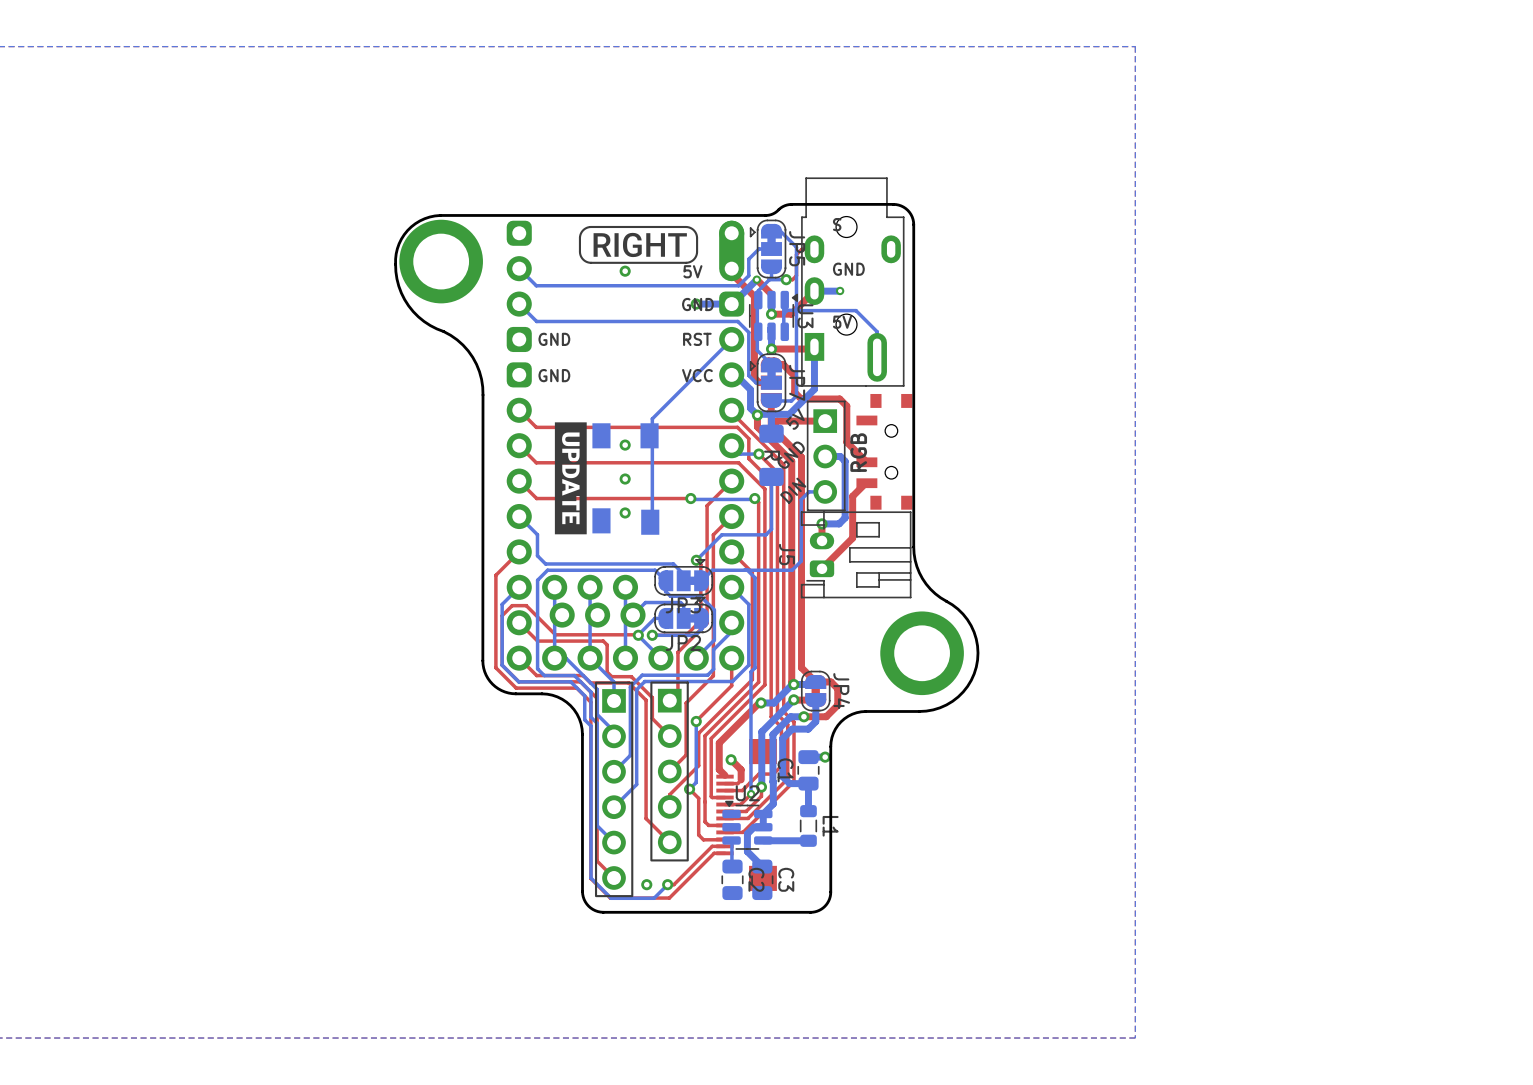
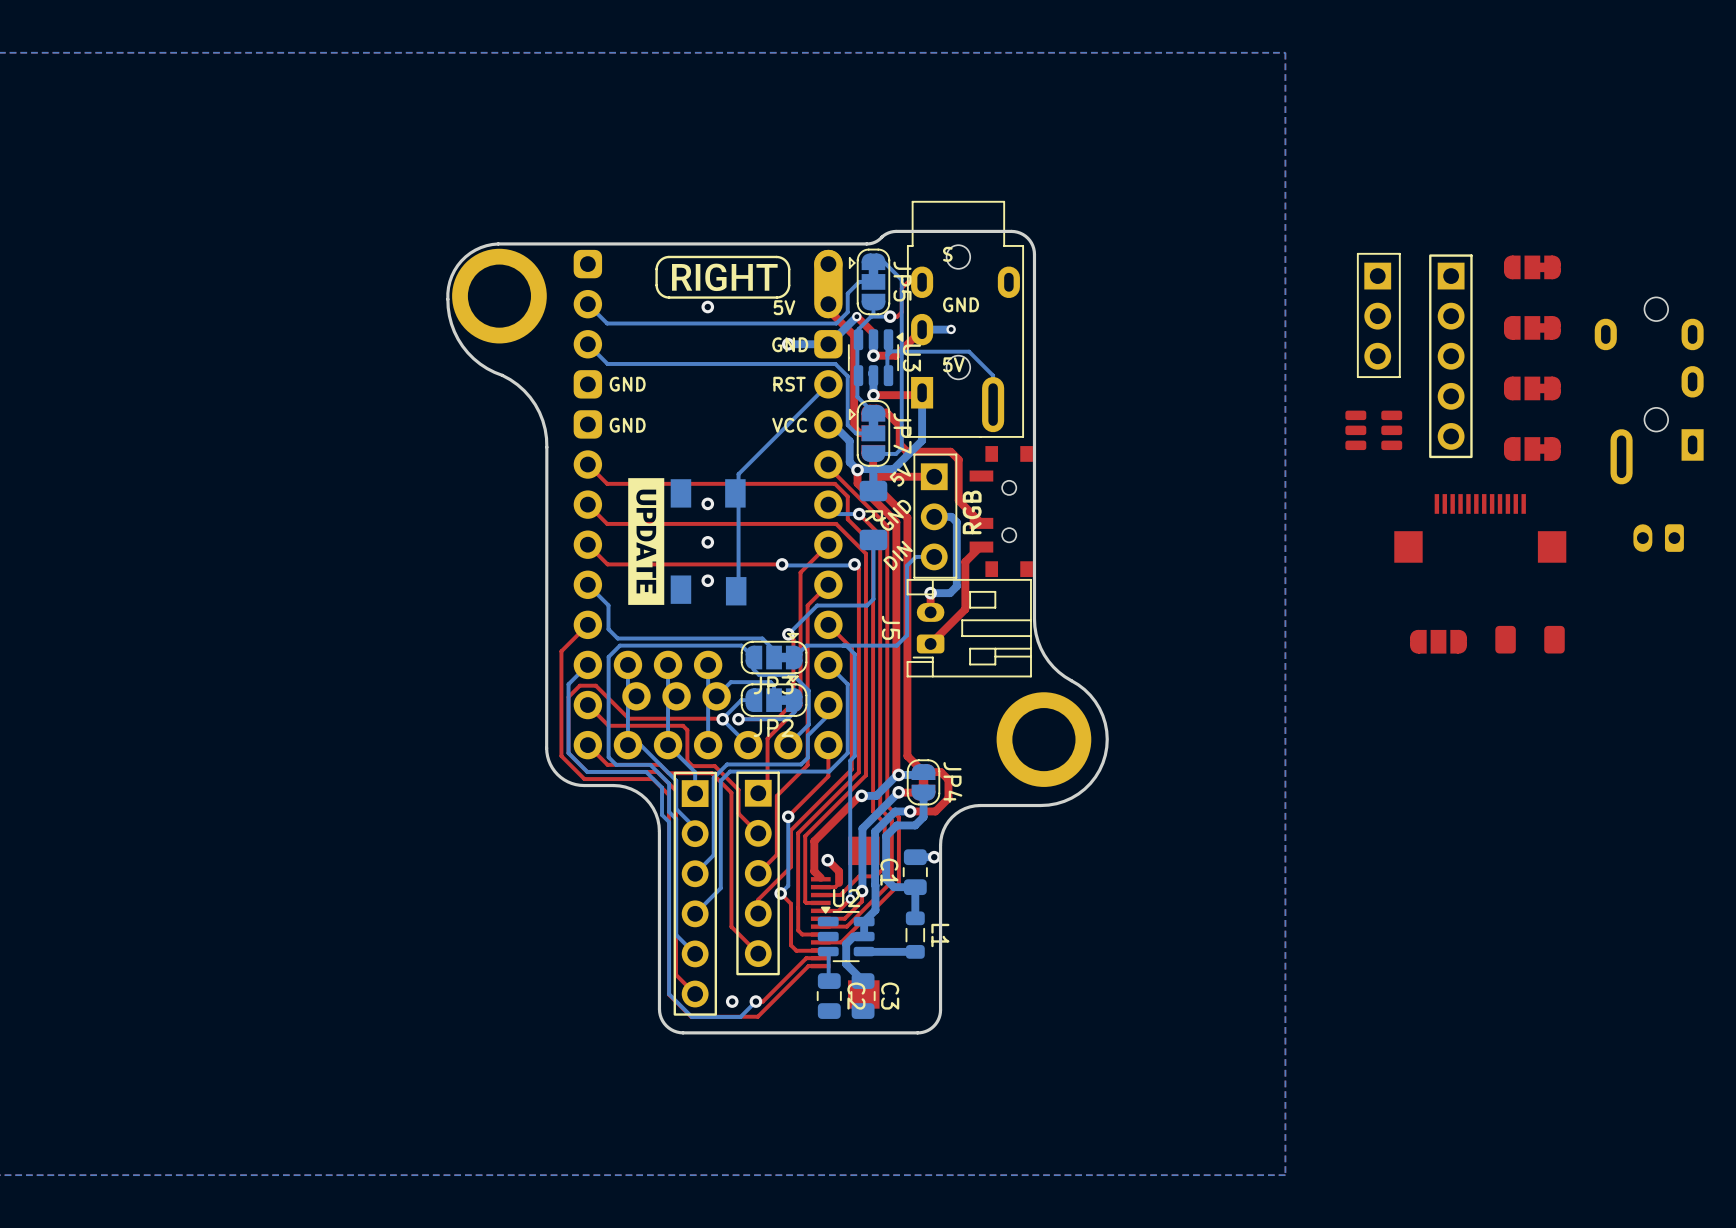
part: none -> (1532, 267)
part: none -> (1378, 315)
part: none -> (1532, 327)
part: none -> (1450, 356)
part: none -> (1532, 388)
part: none -> (1649, 390)
part: none -> (1373, 430)
part: none -> (1532, 448)
part: none -> (1480, 528)
part: none -> (1658, 538)
part: none -> (1530, 639)
part: none -> (1438, 641)

